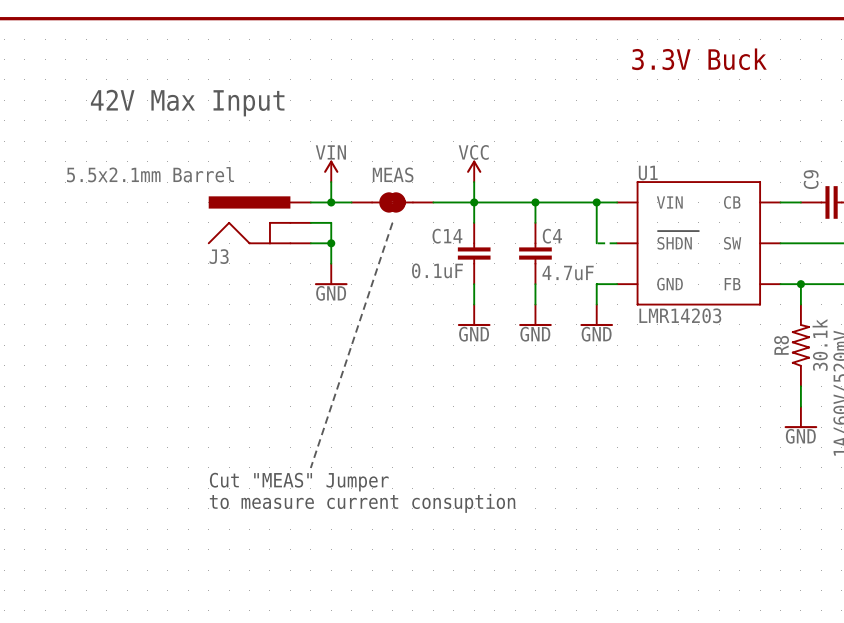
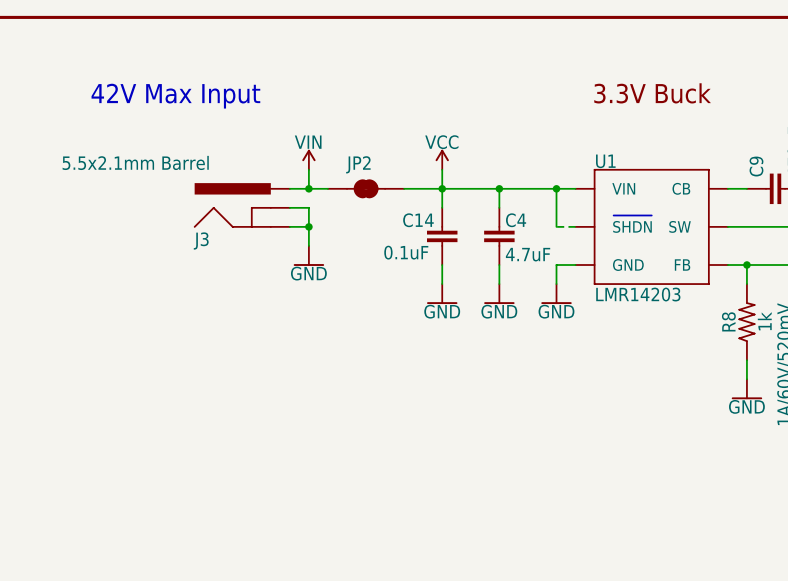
text position: 3.3V Buck (699, 59) -> 3.3V Buck (652, 93)
MEAS name: MEAS (393, 174) -> JP2 (358, 164)
line: (392, 222) (310, 467) -> none
R8 value: 30.1k (820, 344) -> 1k (764, 321)
text: Cut "MEAS" Jumper (299, 482) -> none
text: to measure current consuption (362, 503) -> none

